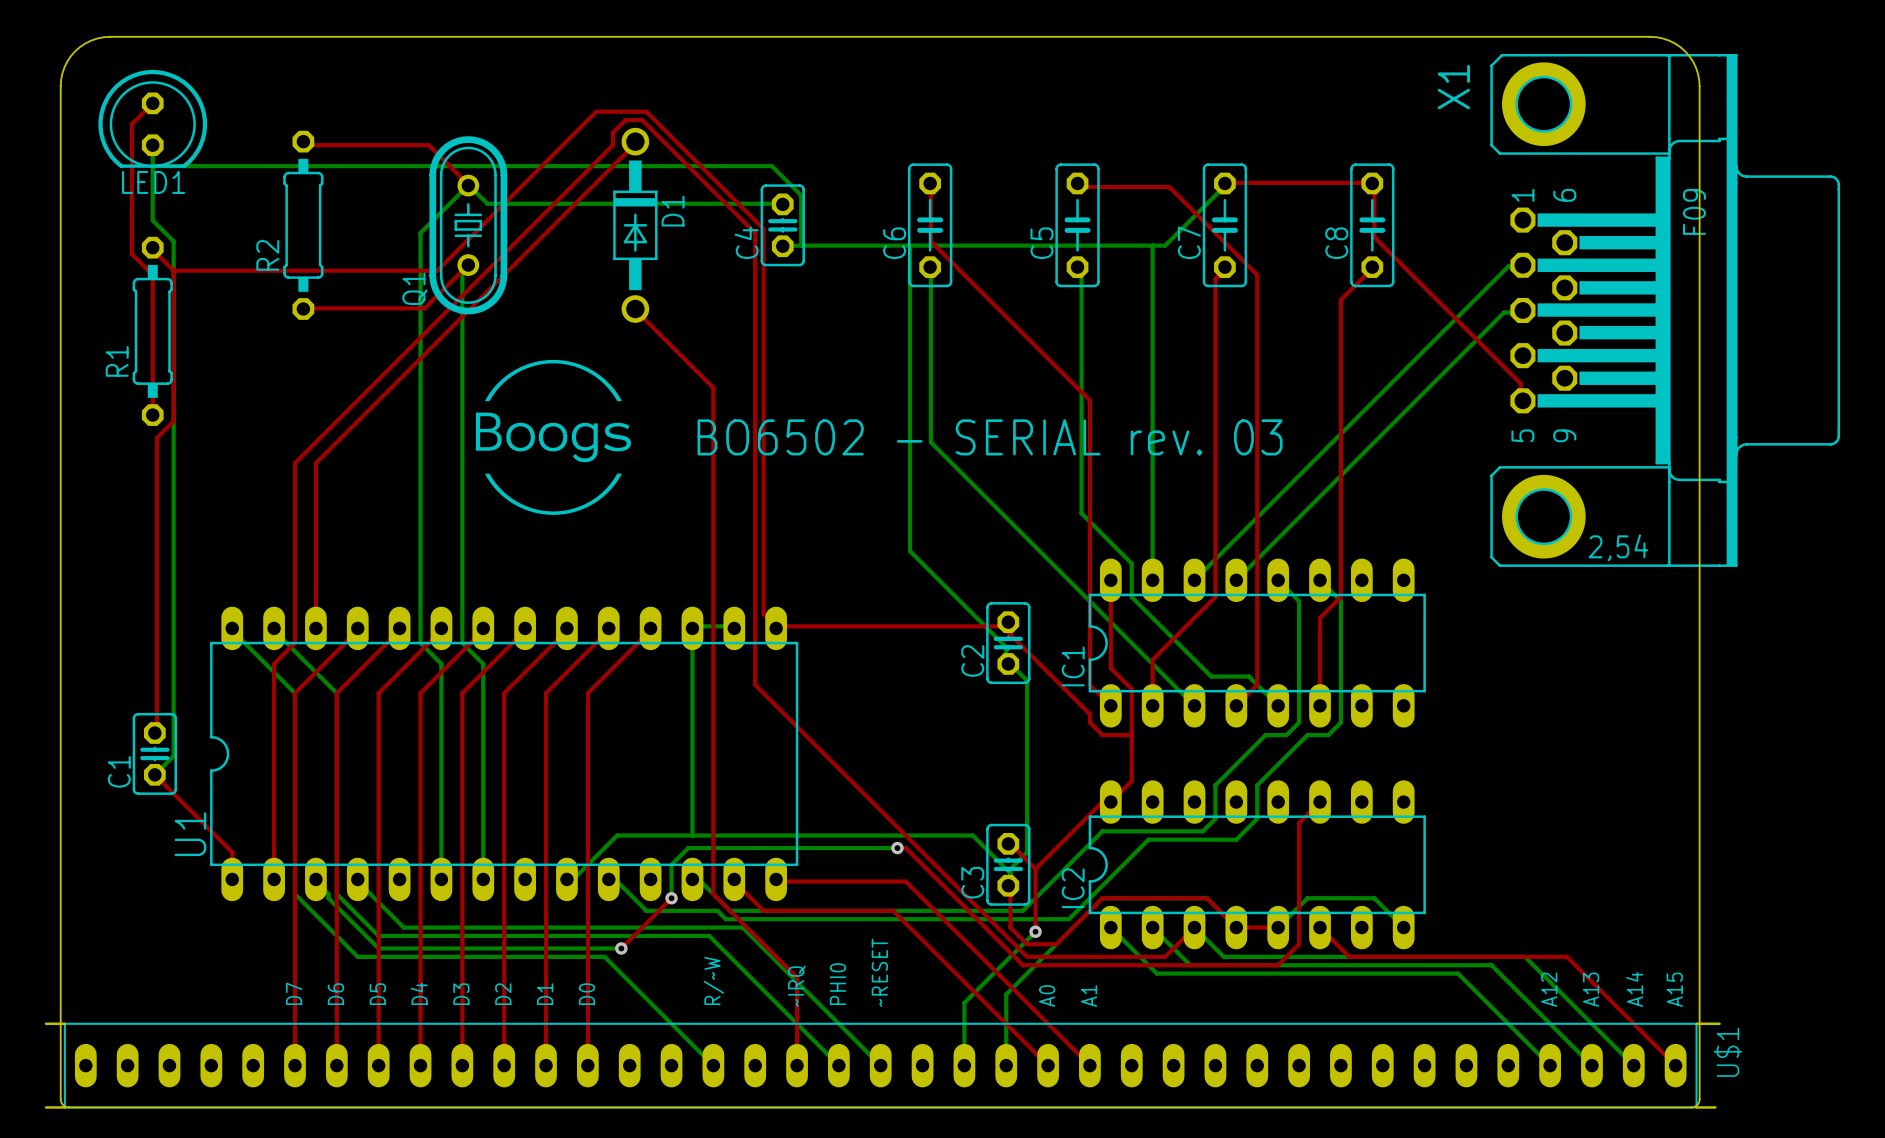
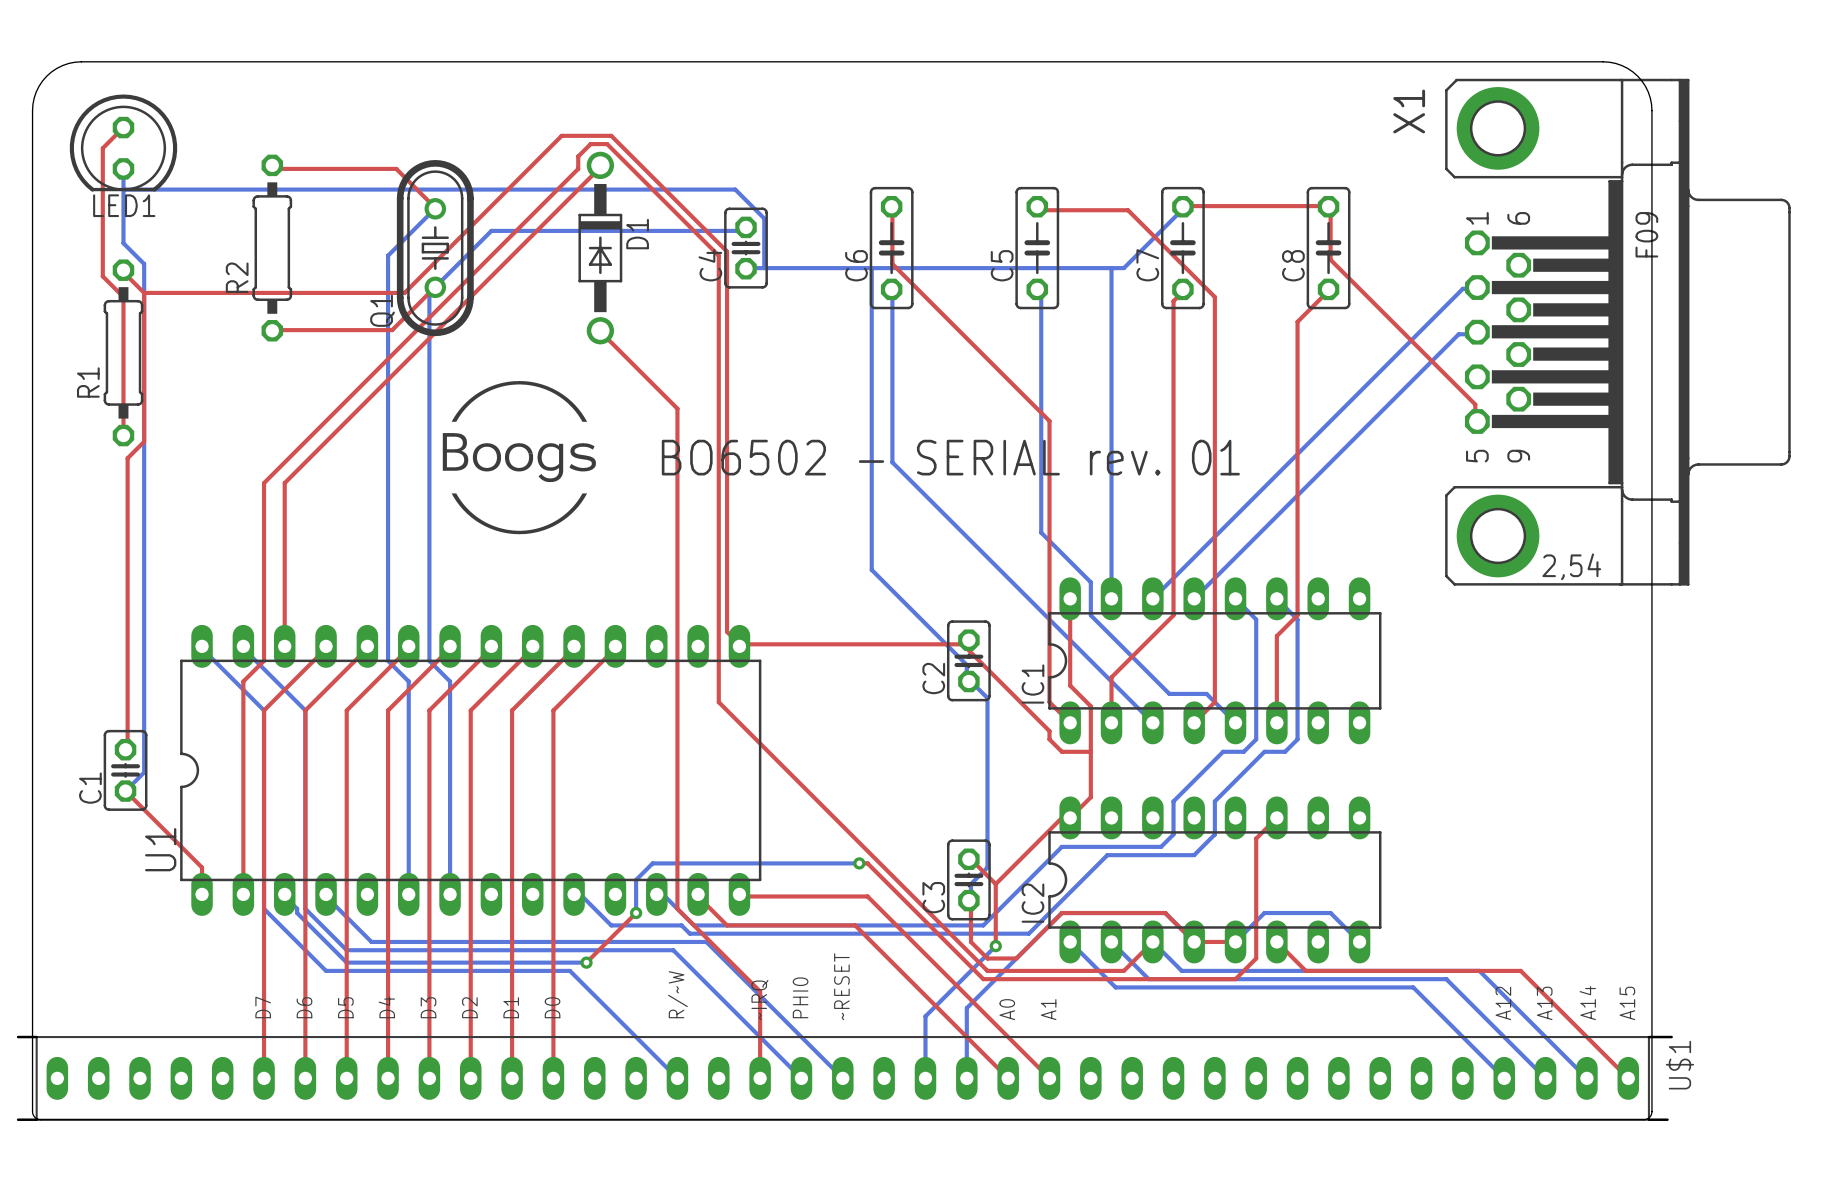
bottom track: (468, 185) (487, 203) (782, 204) -> (437, 284) (491, 230) (743, 230) (746, 227)
text: BO6502 - SERIAL rev. 03 (990, 437) -> BO6502 - SERIAL rev. 01 (950, 457)
bottom track: (734, 628) (734, 626) (692, 626) (692, 835) -> none
bottom track: (1010, 873) (972, 835) (617, 835) (575, 877) (566, 877) (566, 879) -> none

